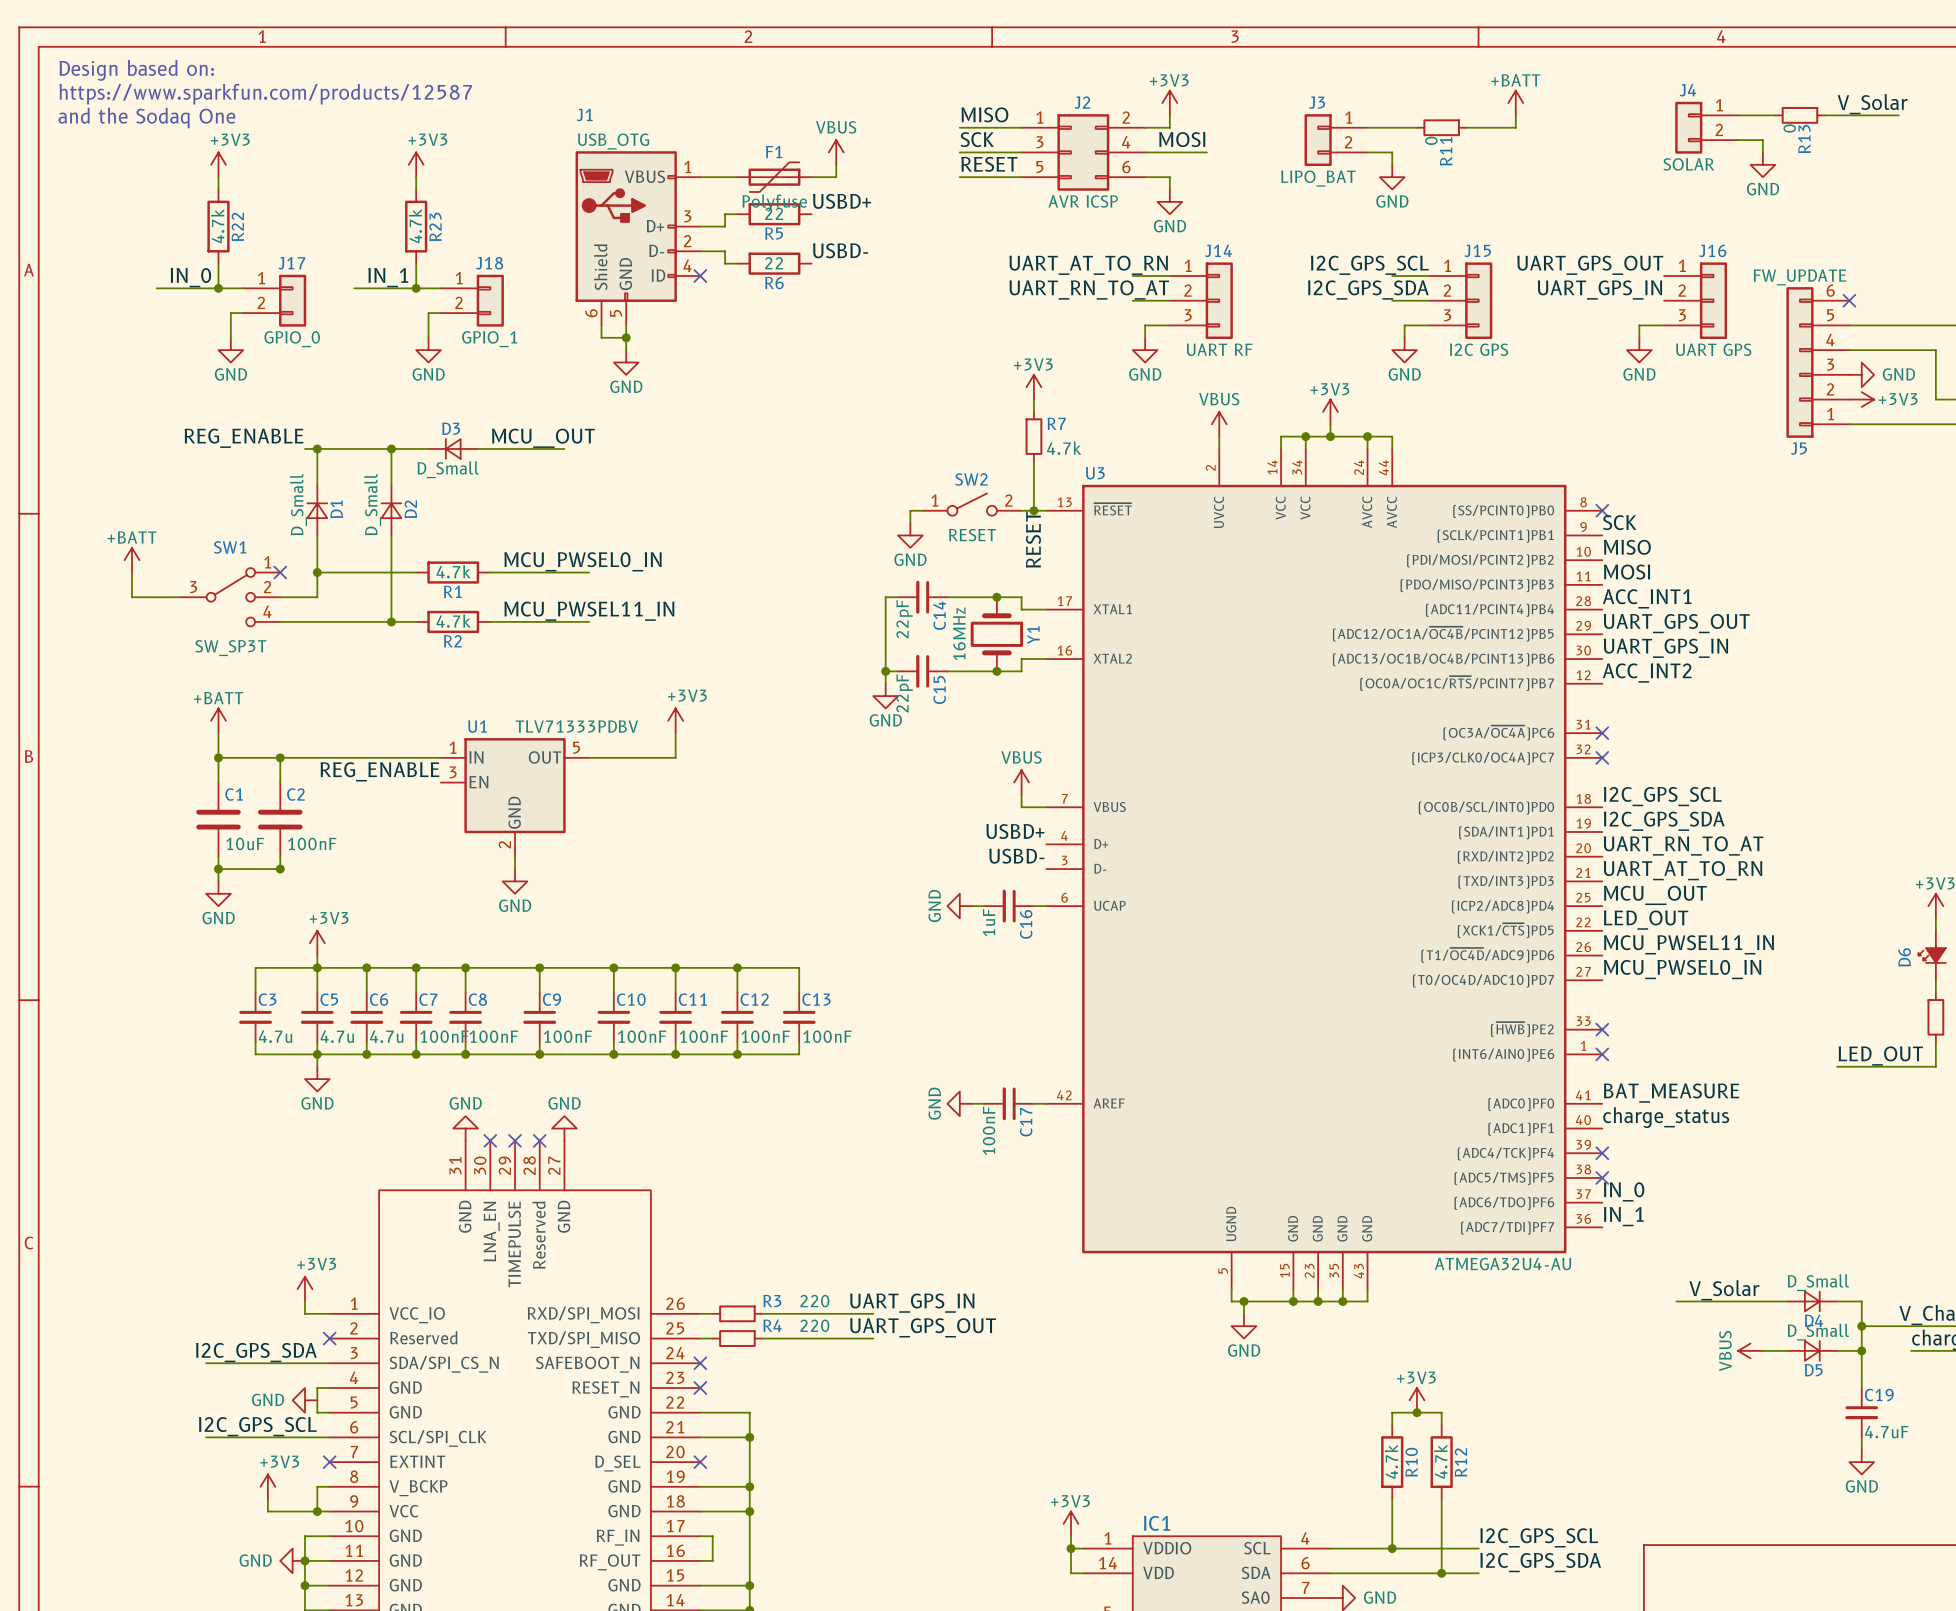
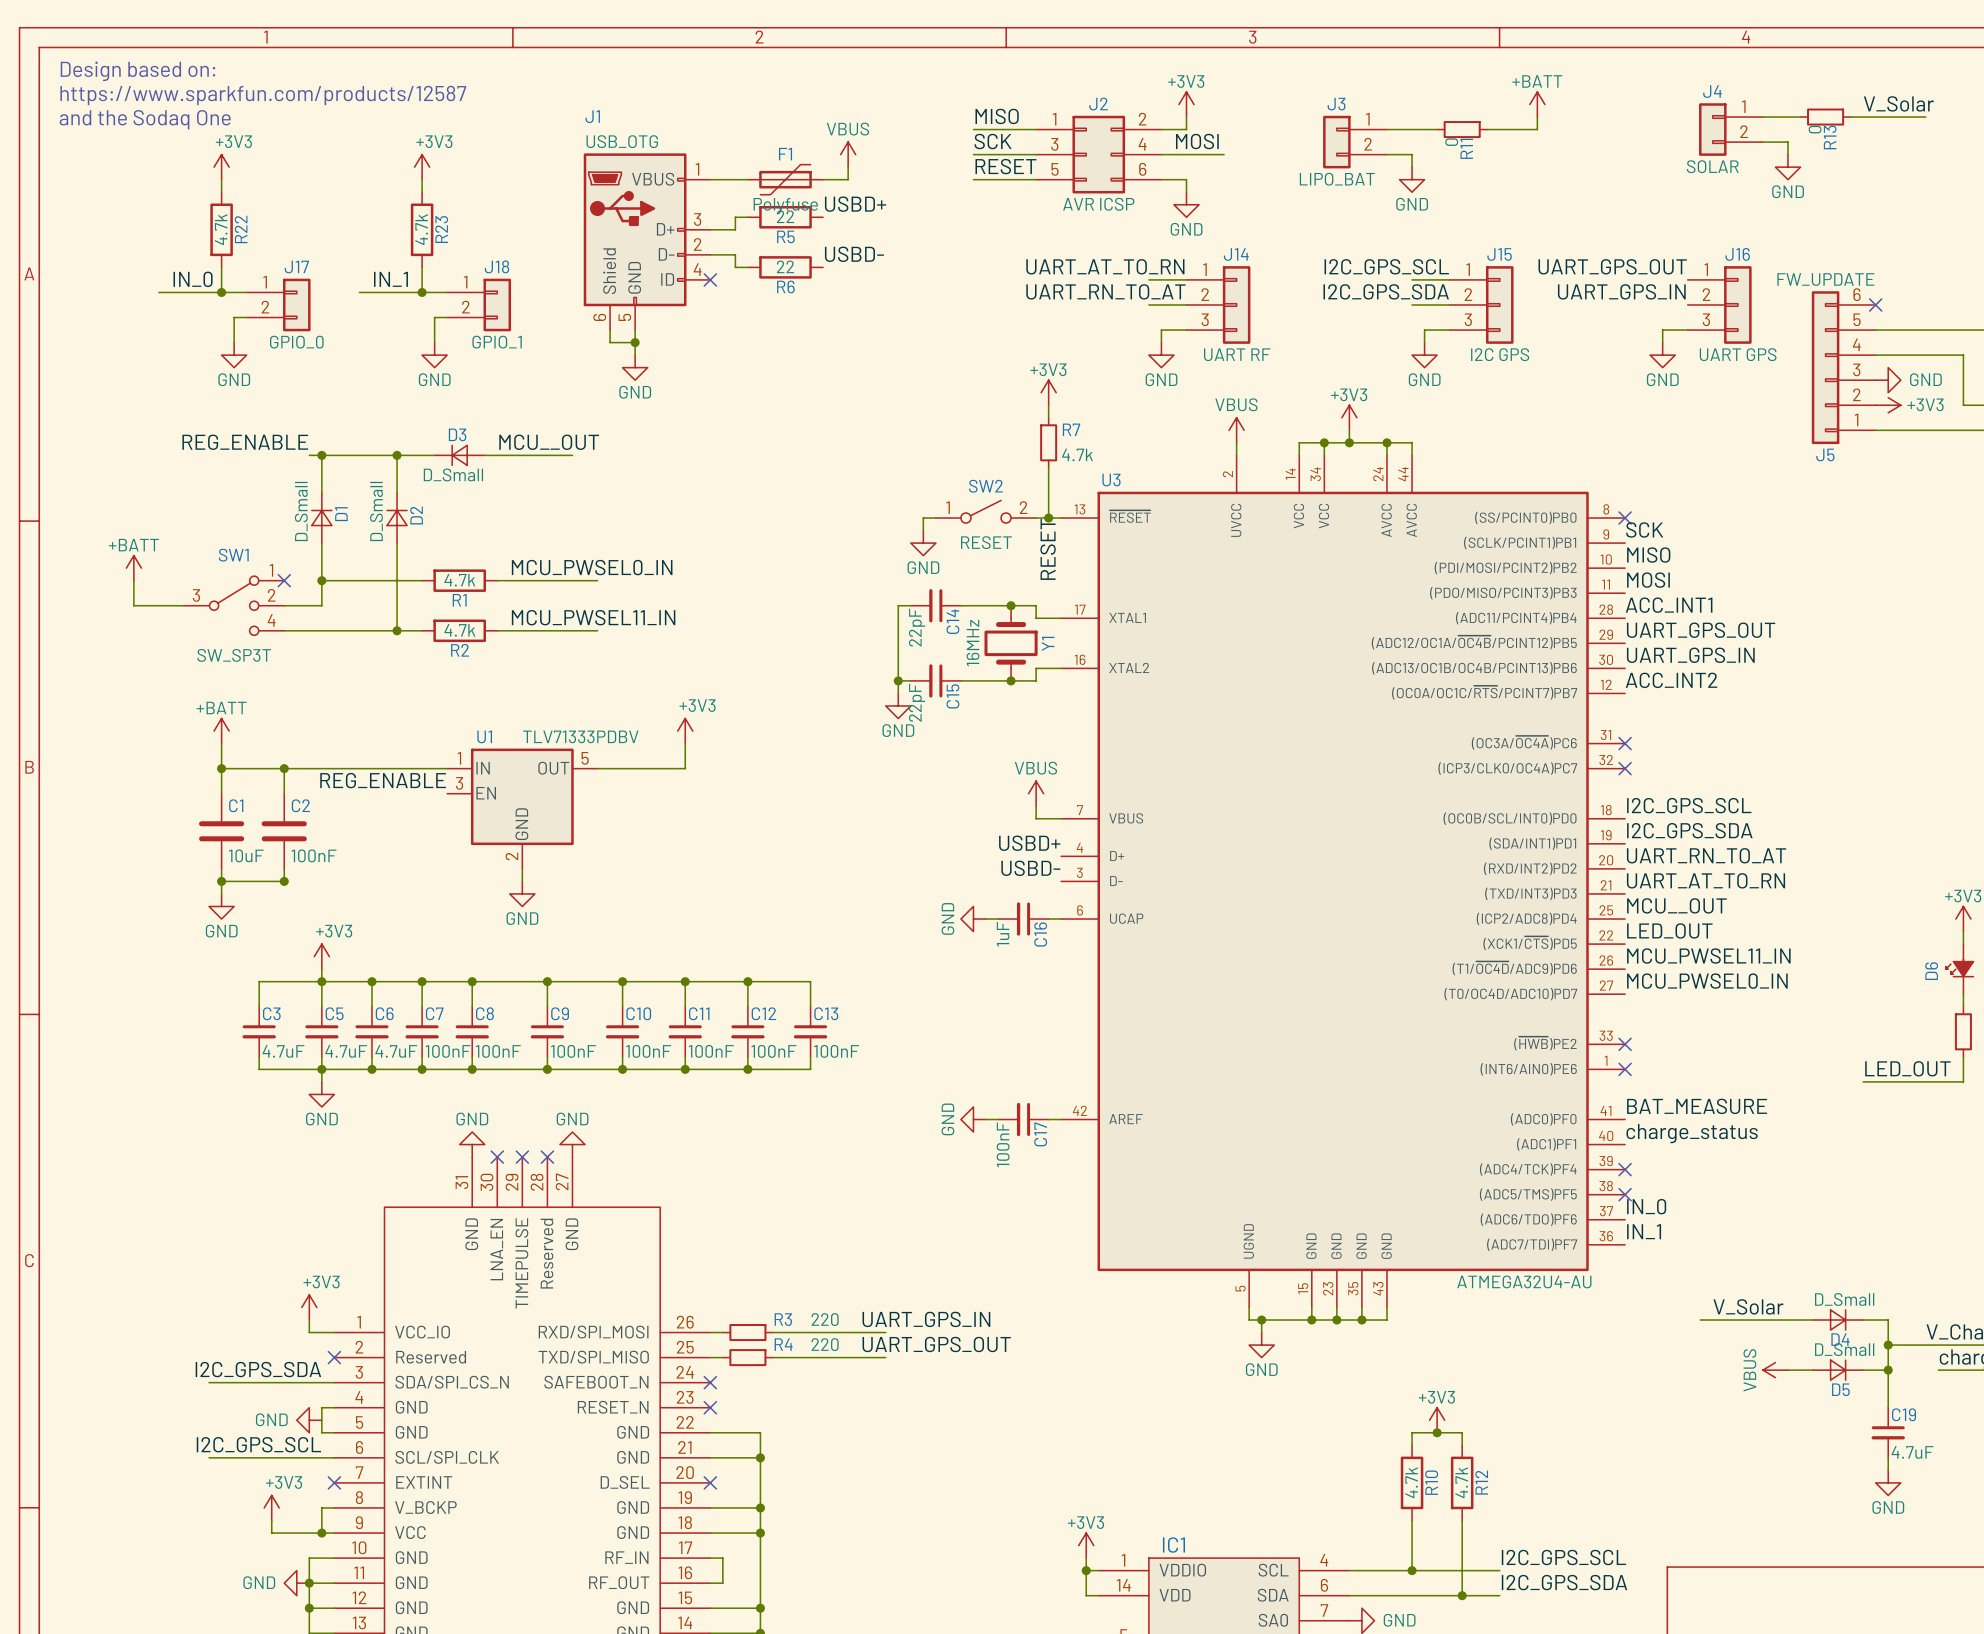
C3 value: 4.7u (275, 1036) -> 4.7uF (283, 1051)
C5 value: 4.7u (337, 1036) -> 4.7uF (346, 1051)
C6 value: 4.7u (386, 1036) -> 4.7uF (396, 1051)

